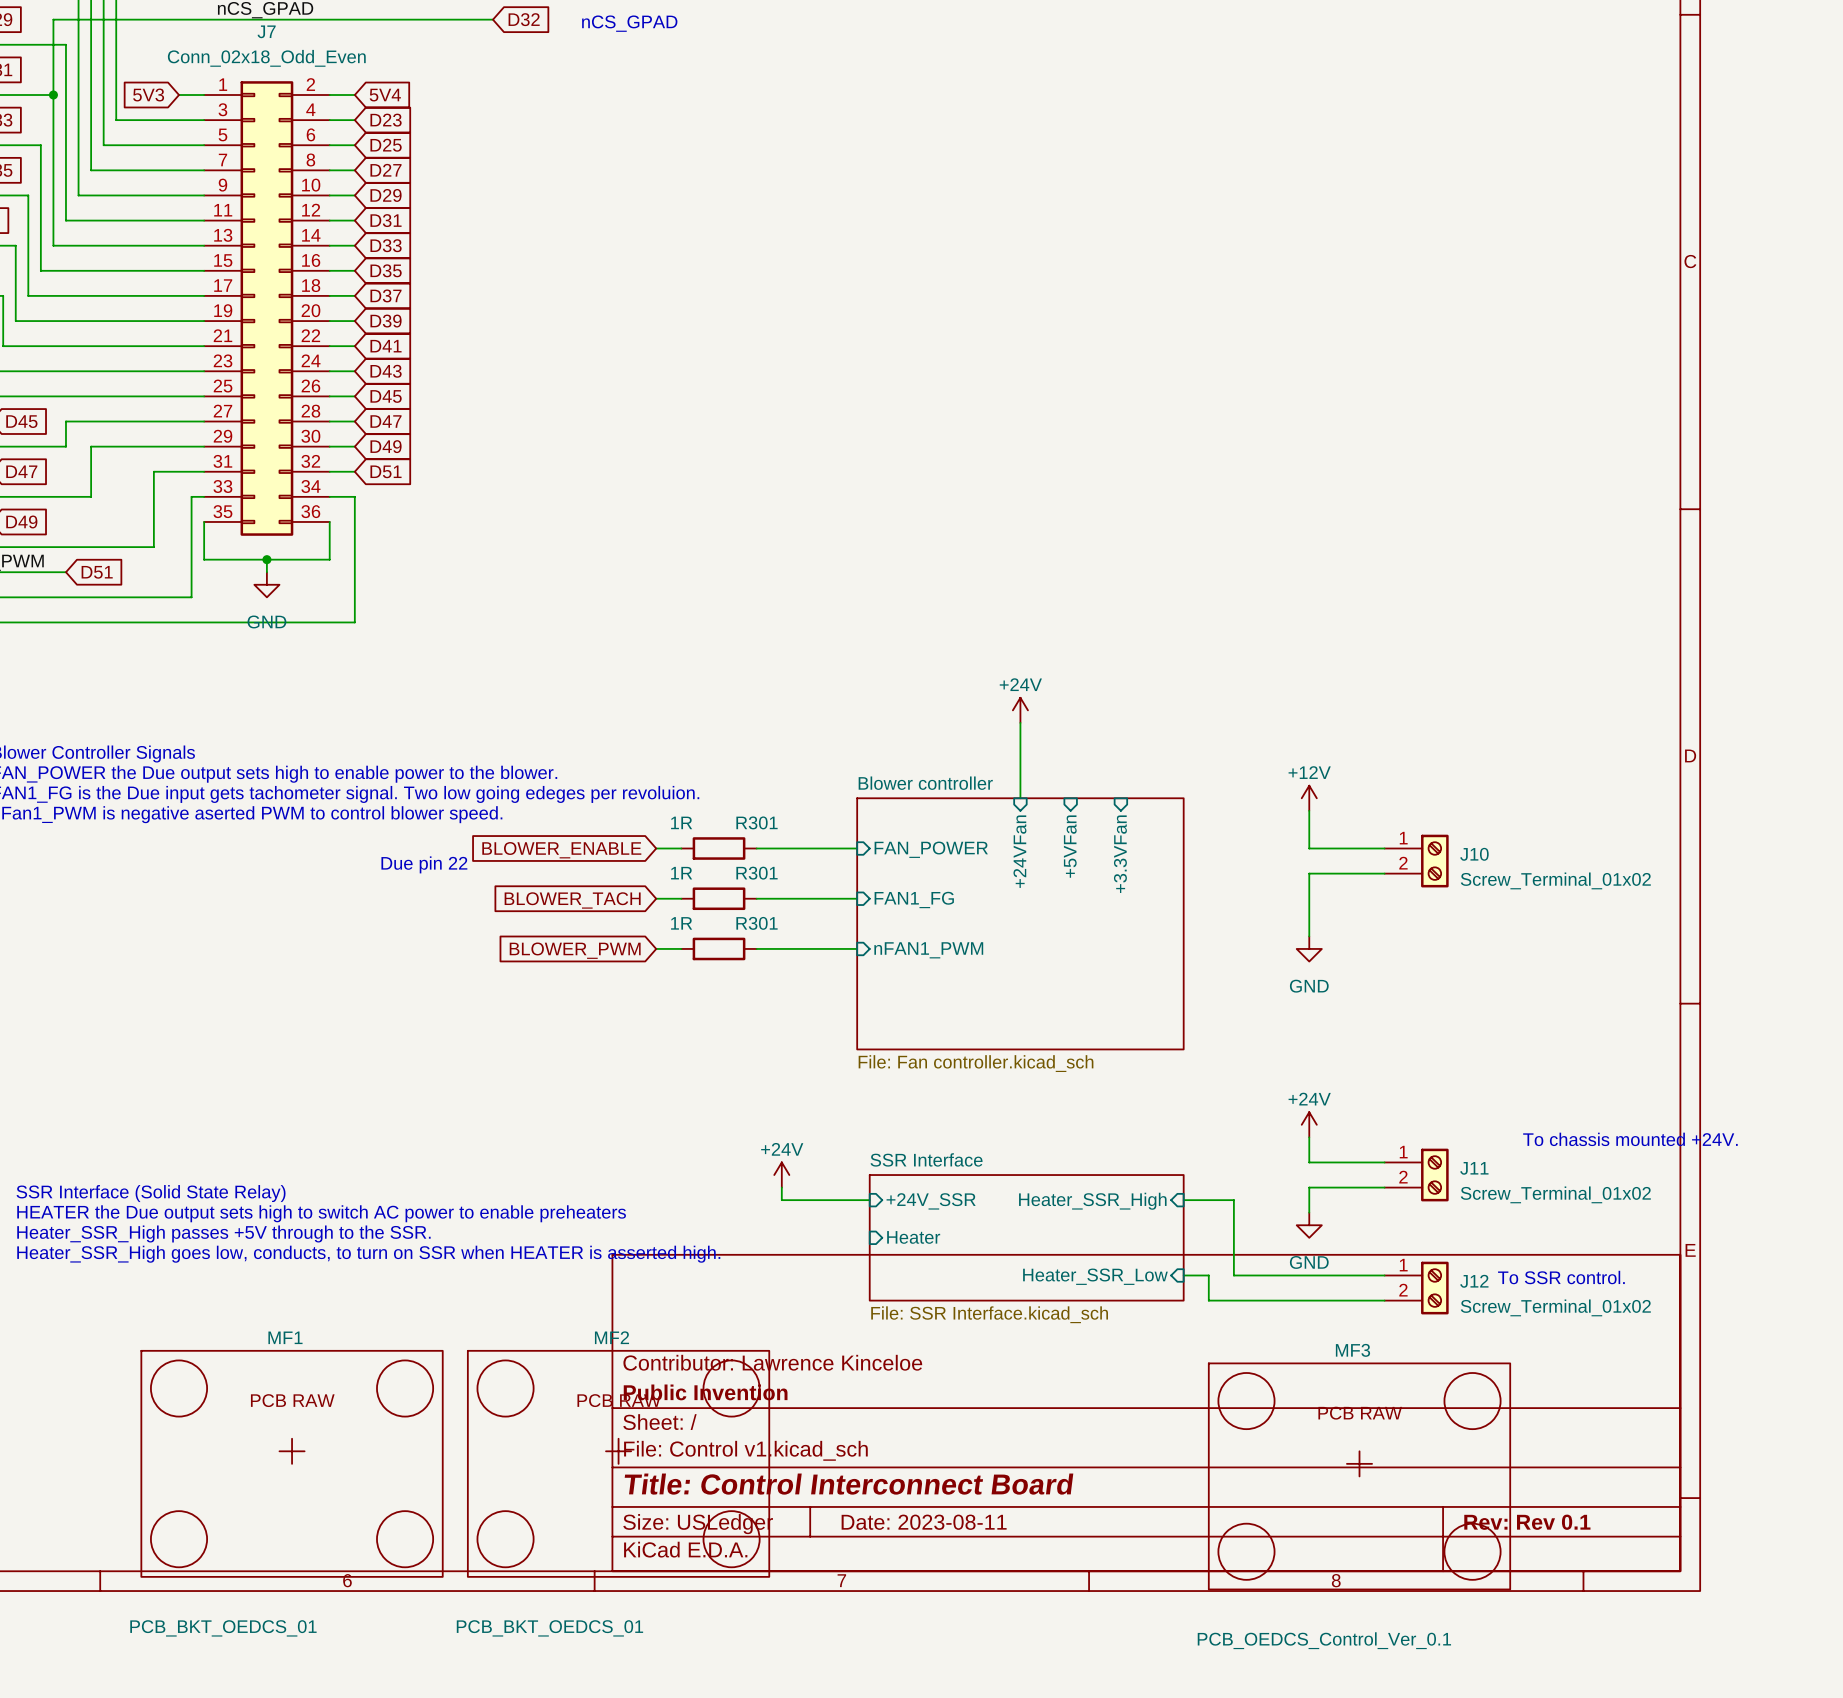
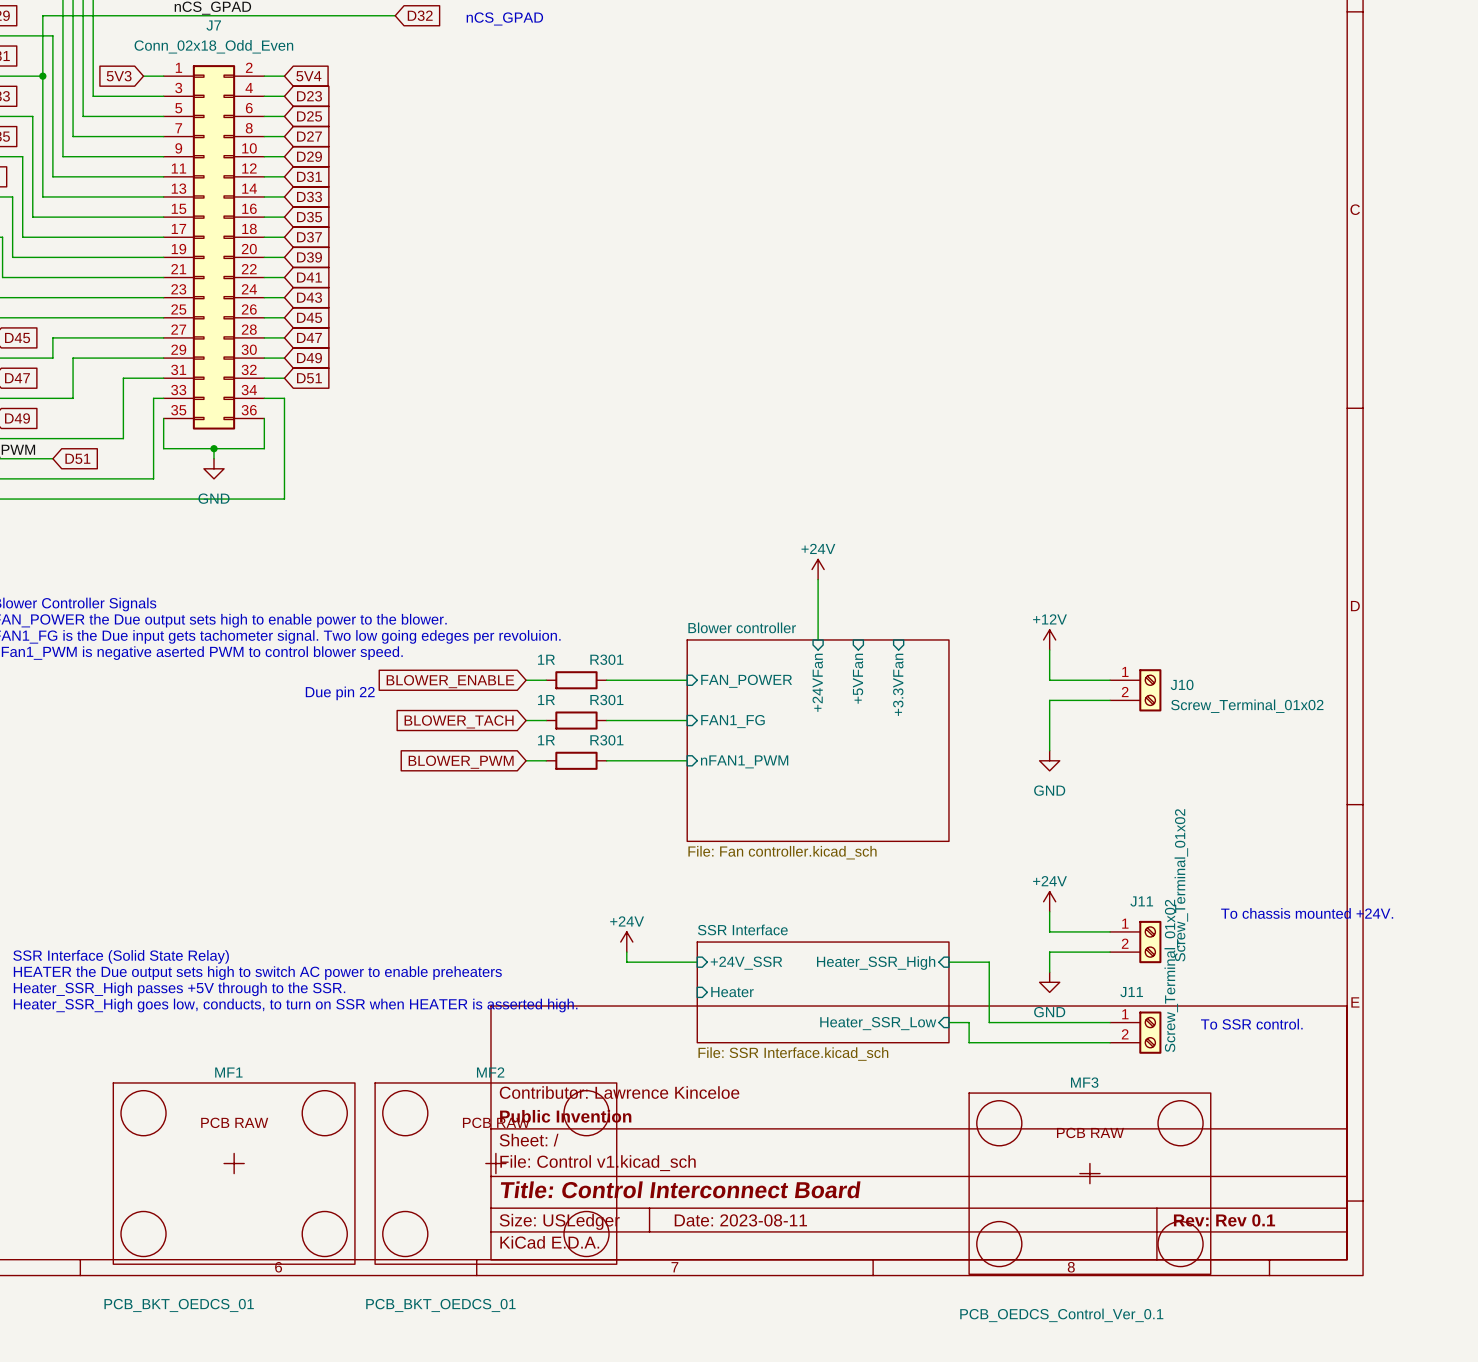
J11 name position: J11 (1474, 1168) -> J11 (1141, 901)
J11 value rotation: 0° (1555, 1194) -> 90° counterclockwise (1181, 885)
J12 name: J12 (1474, 1281) -> J11 (1131, 992)
J12 value rotation: 0° (1555, 1307) -> 90° counterclockwise (1171, 975)

